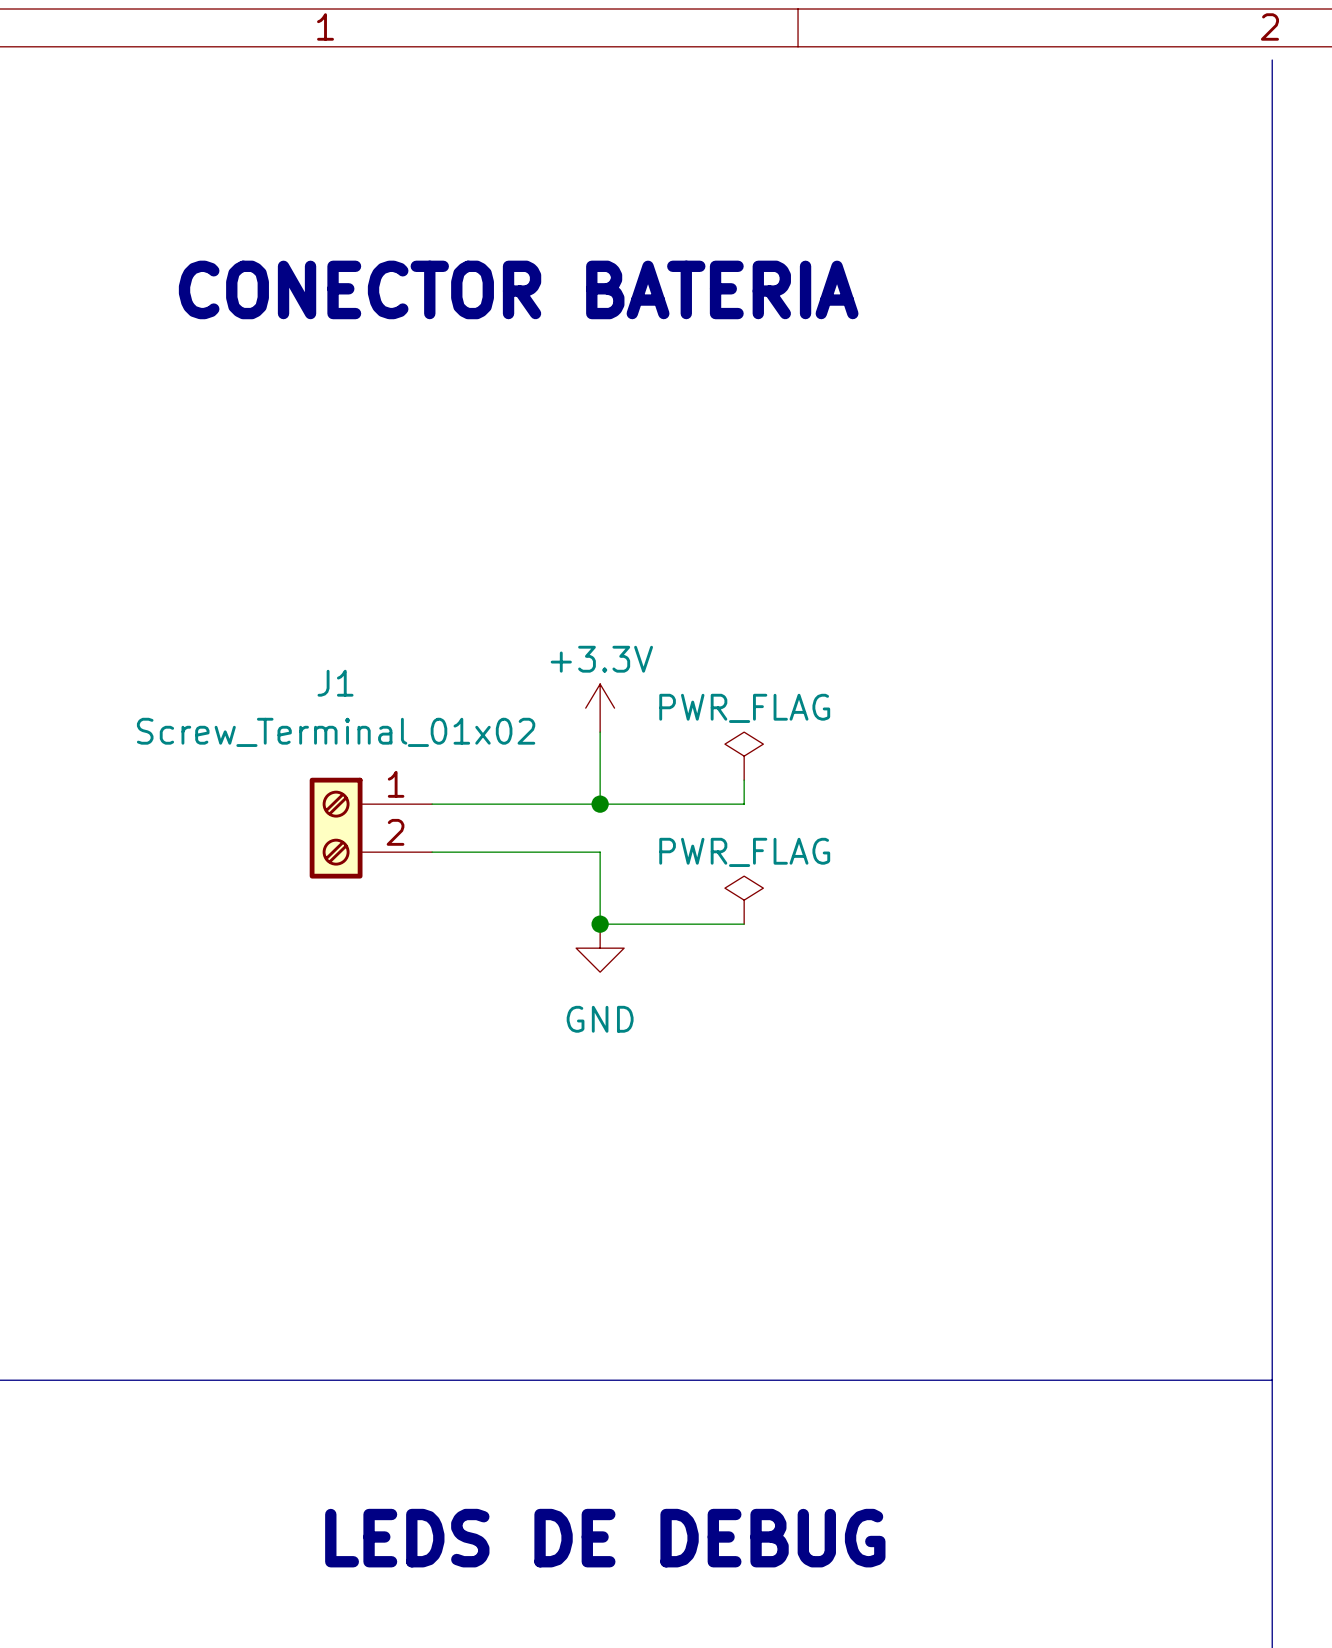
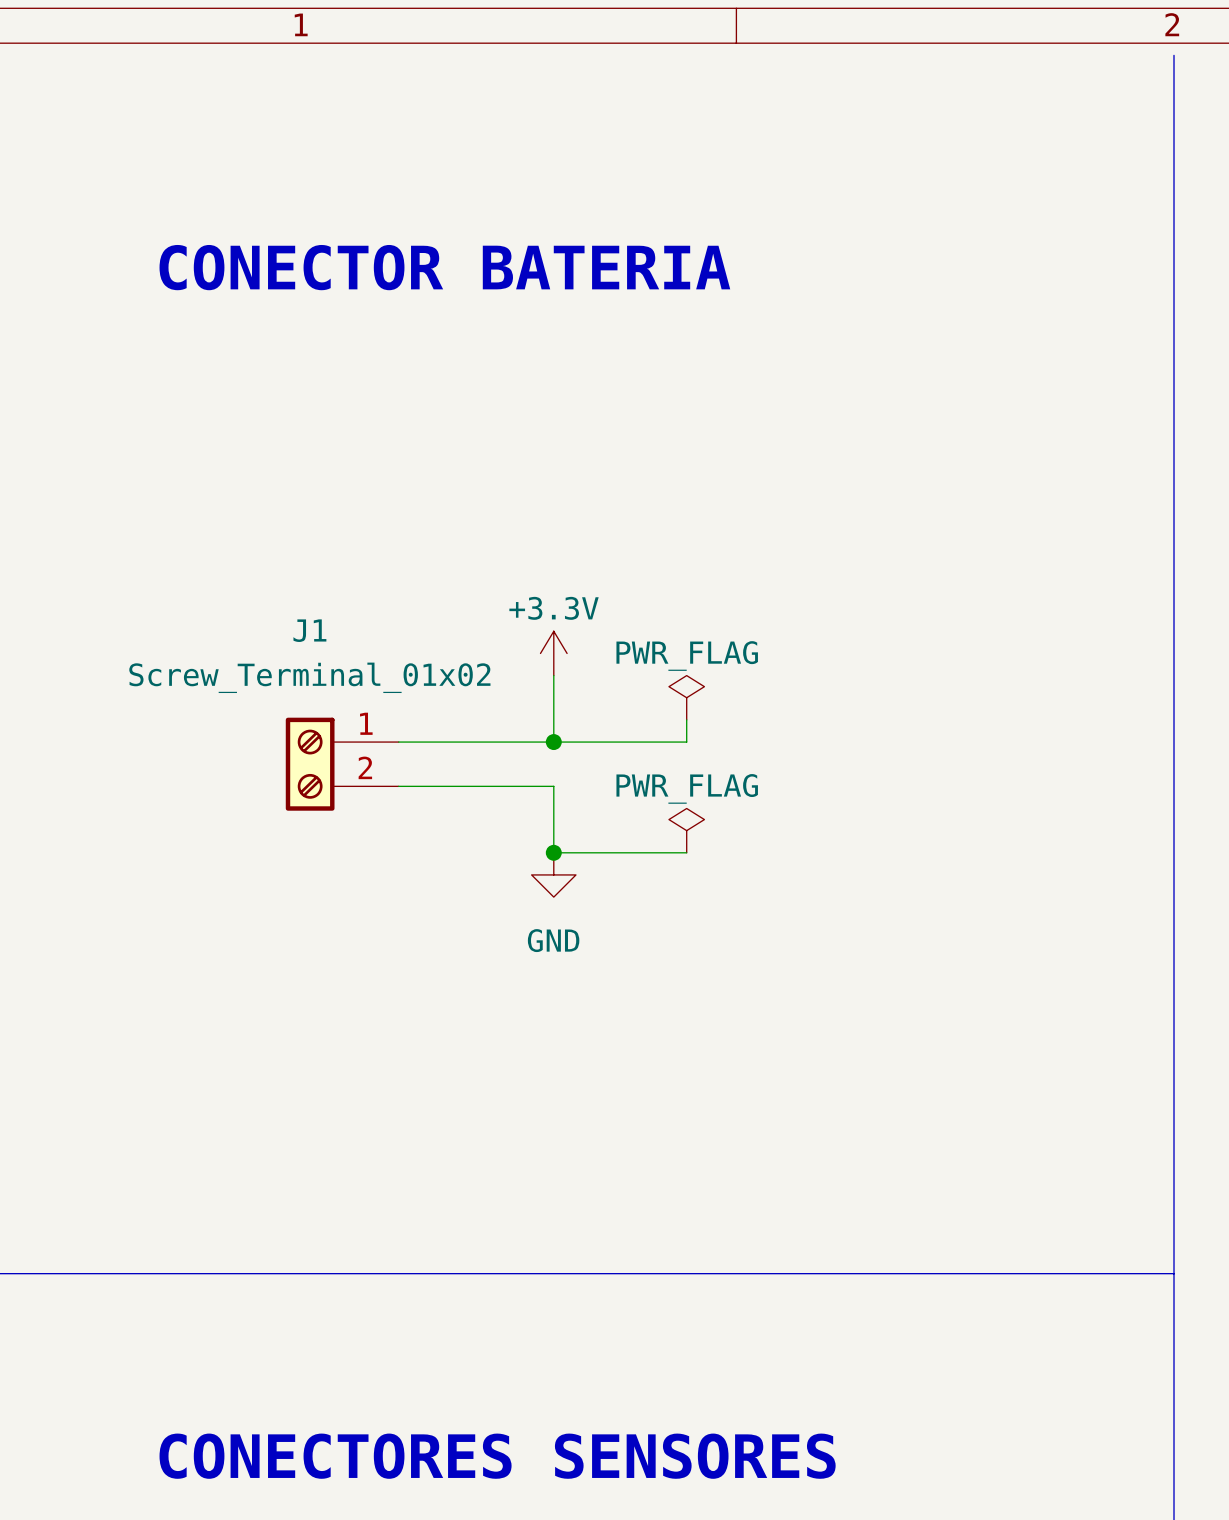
text: LEDS DE DEBUG (605, 1538) -> none
text: none -> CONECTORES SENSORES (497, 1456)

